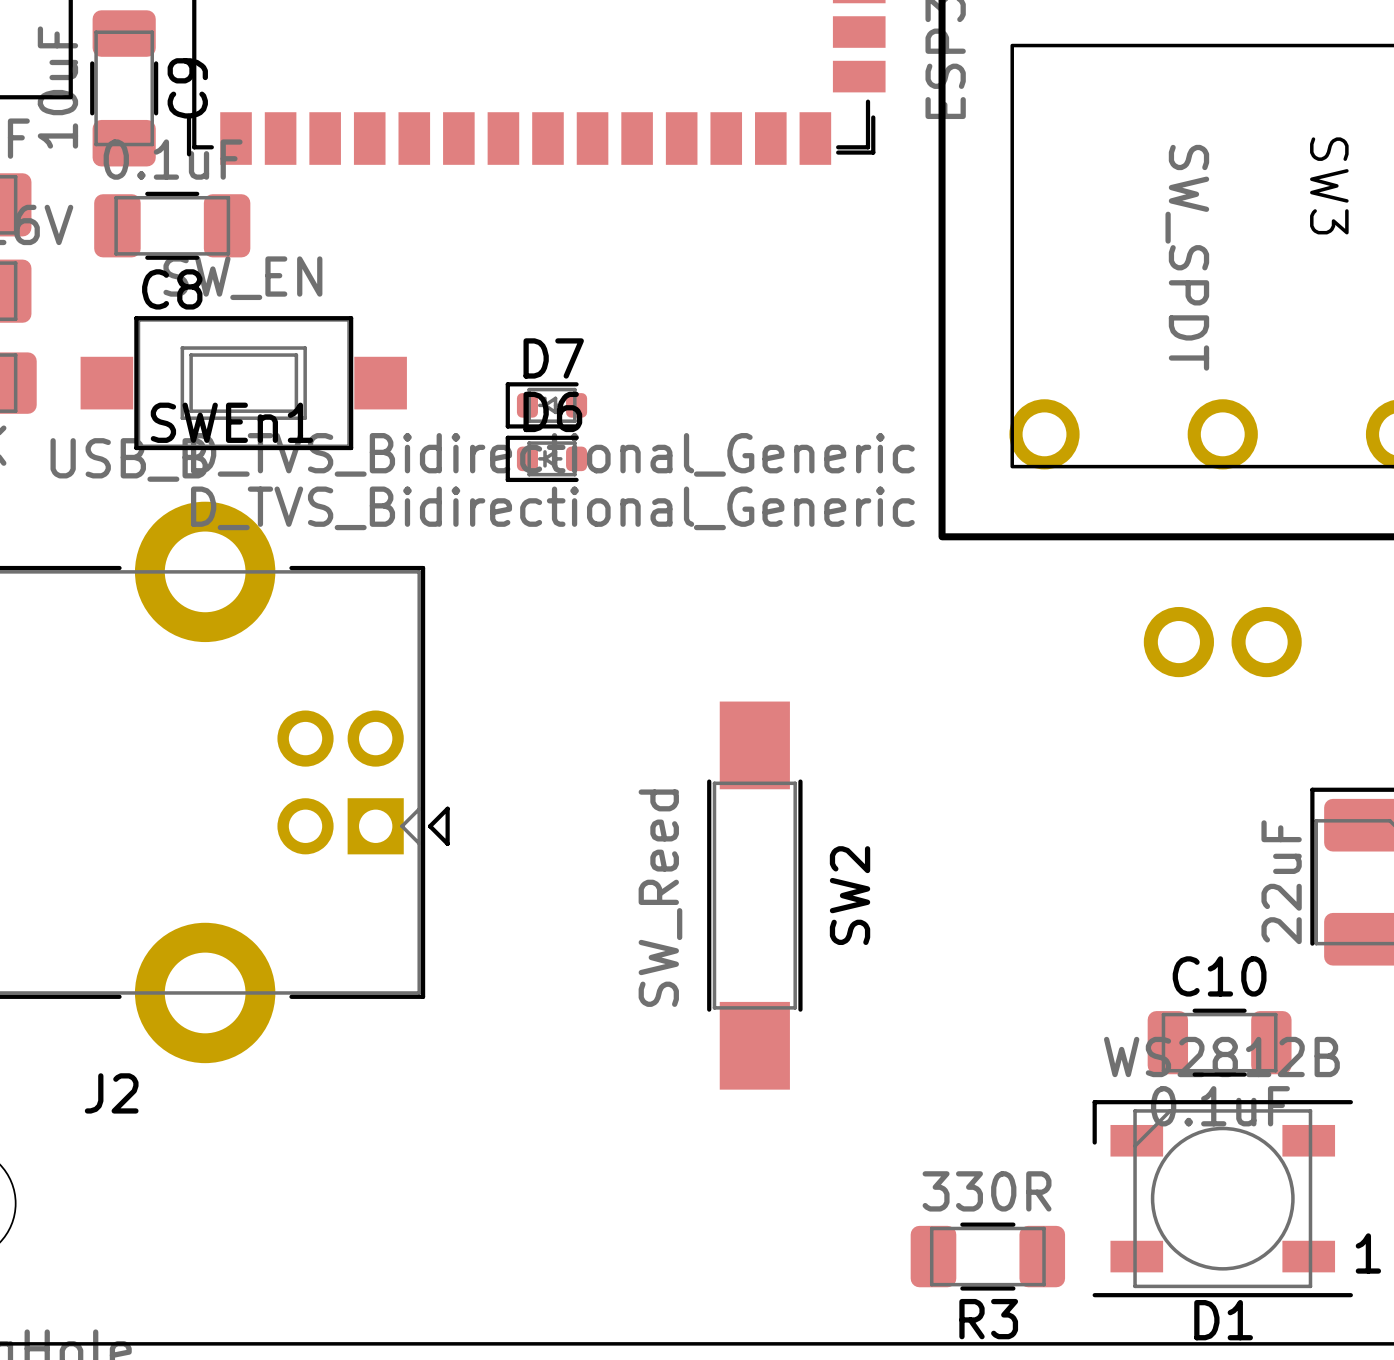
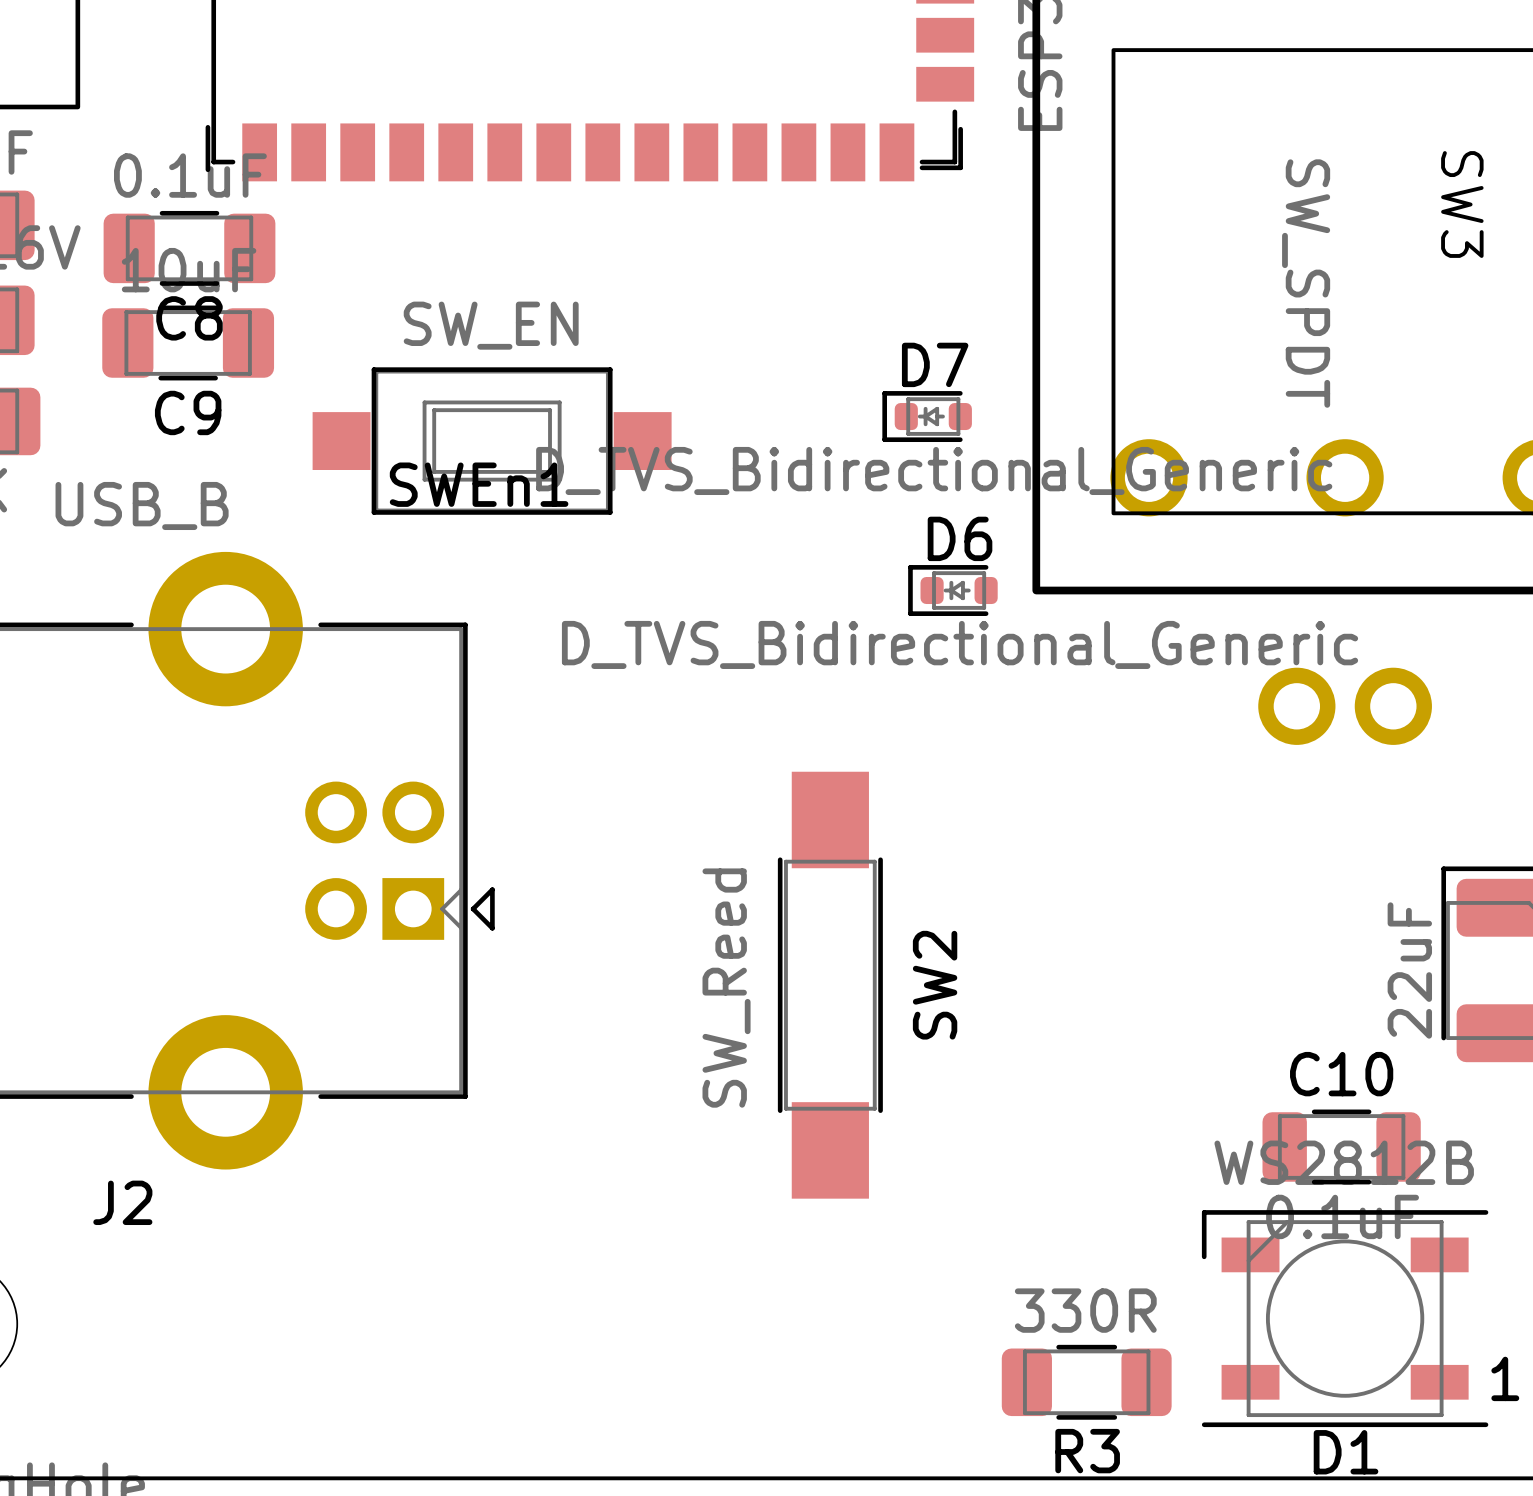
C9 rotation: 0° (124, 88) -> 90° clockwise (188, 343)
C9 position: (124, 88) -> (188, 343)
SWEn1 position: (243, 383) -> (492, 441)
D7 position: (546, 405) -> (927, 416)
D6 position: (546, 458) -> (952, 590)

